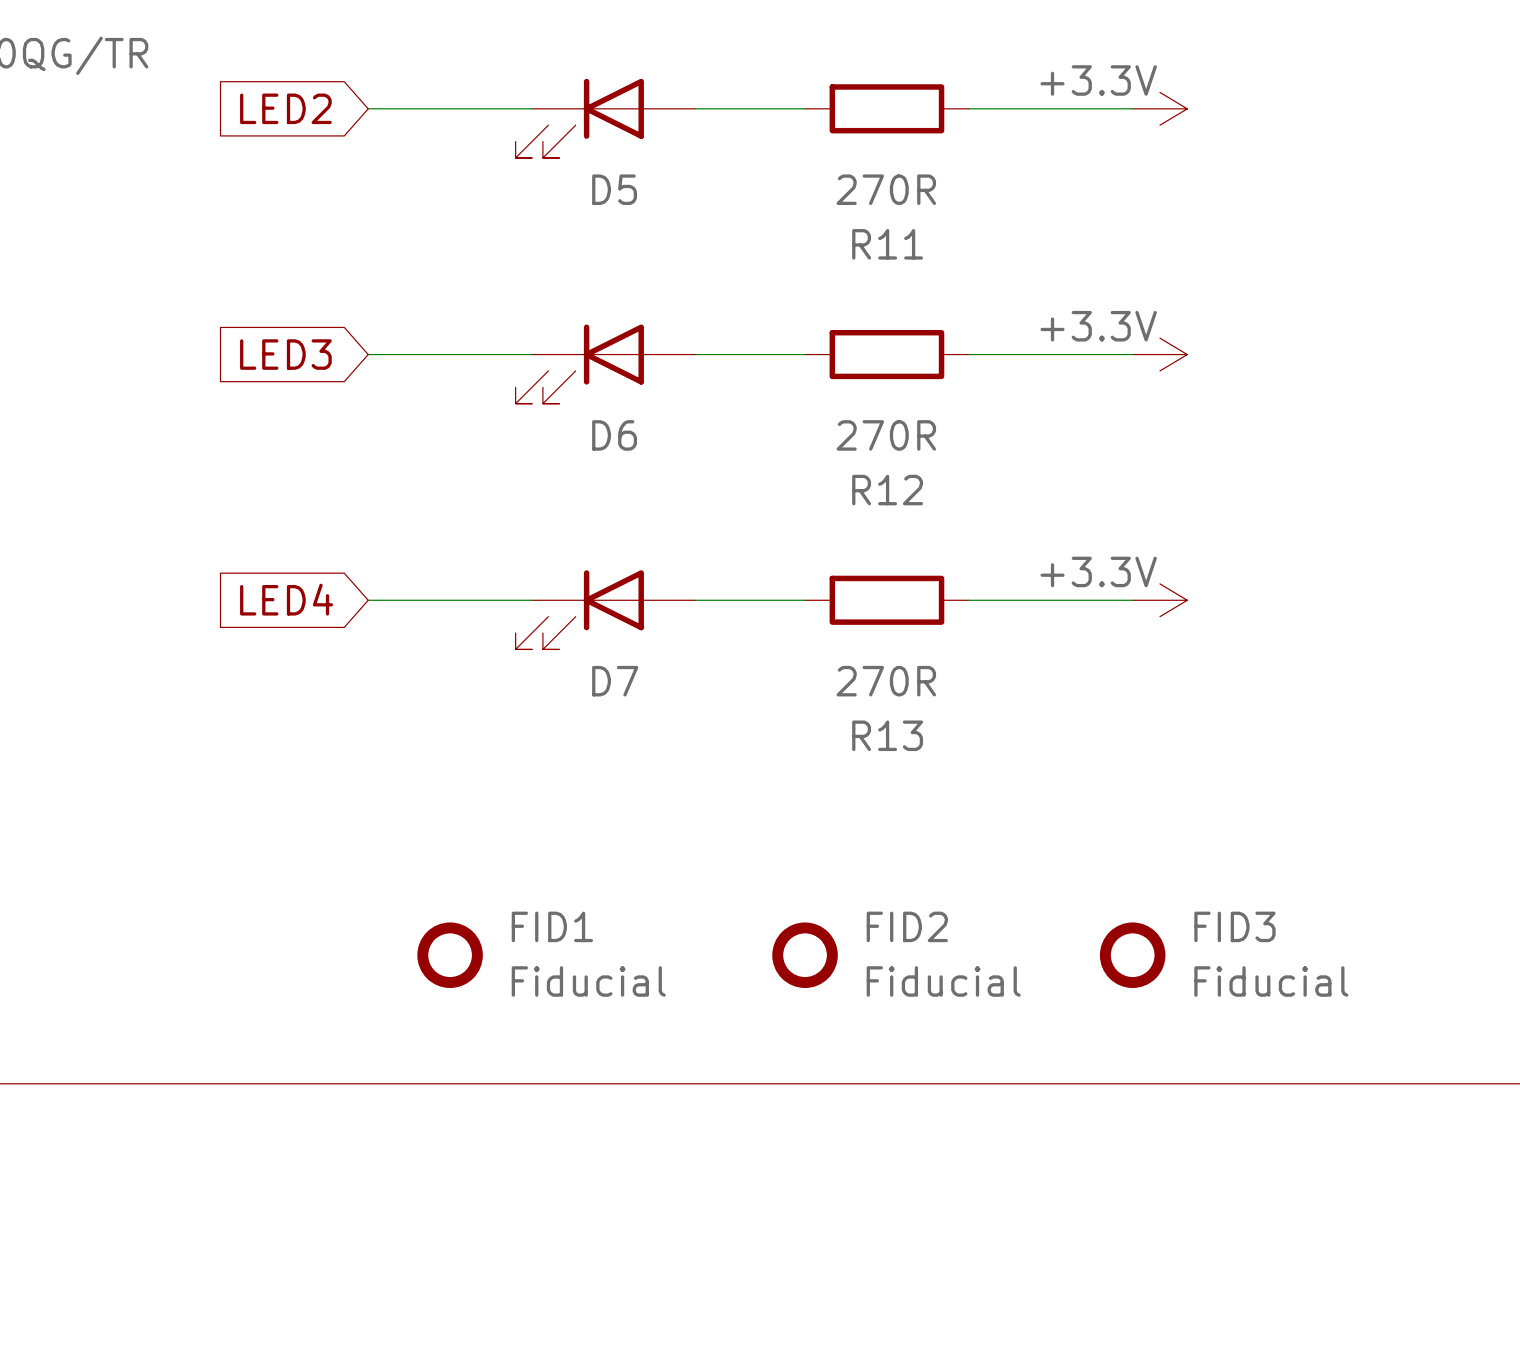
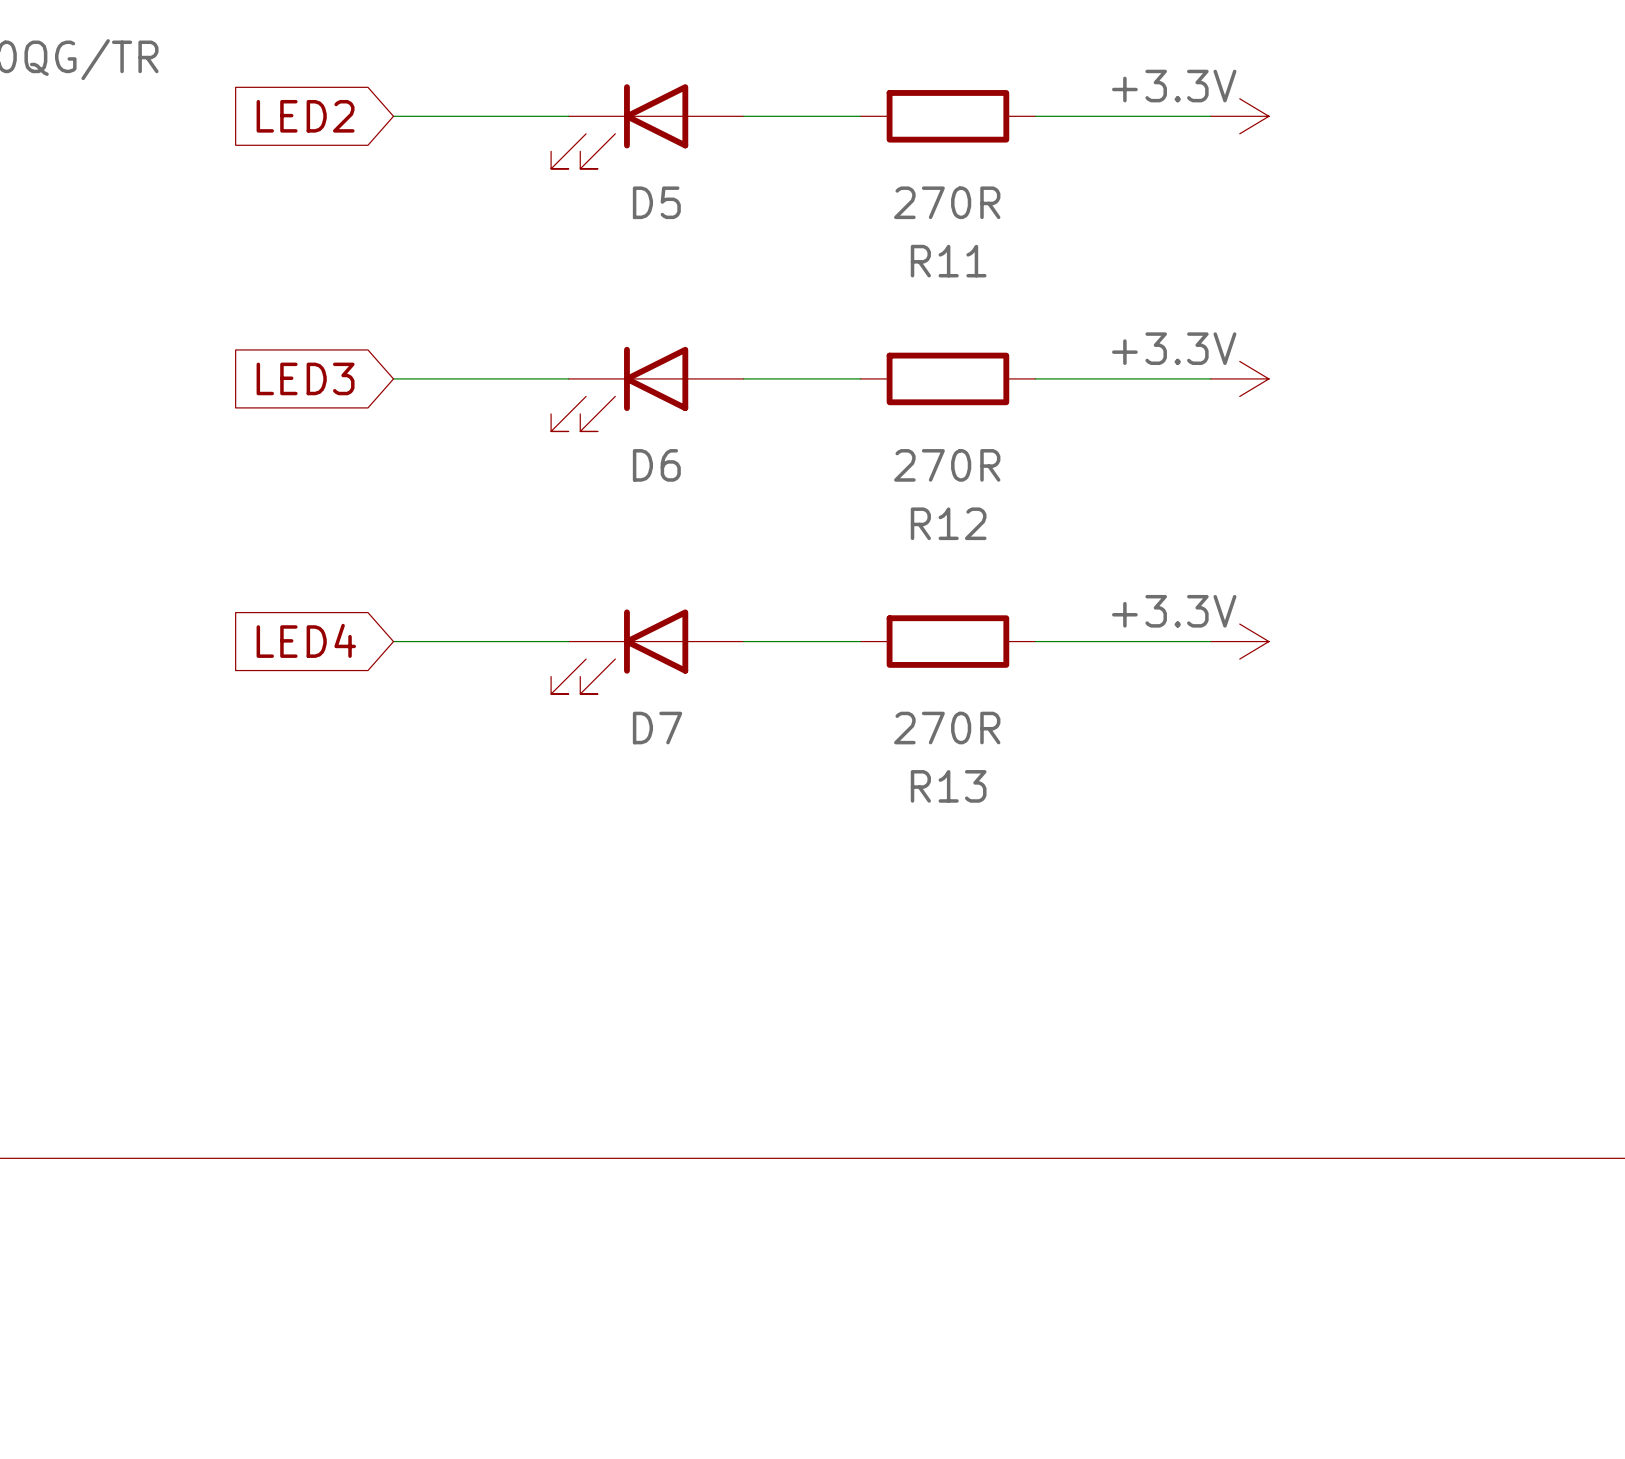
FID1: Fiducial (450, 955) -> none
FID2: Fiducial (805, 955) -> none
FID3: Fiducial (1132, 955) -> none

